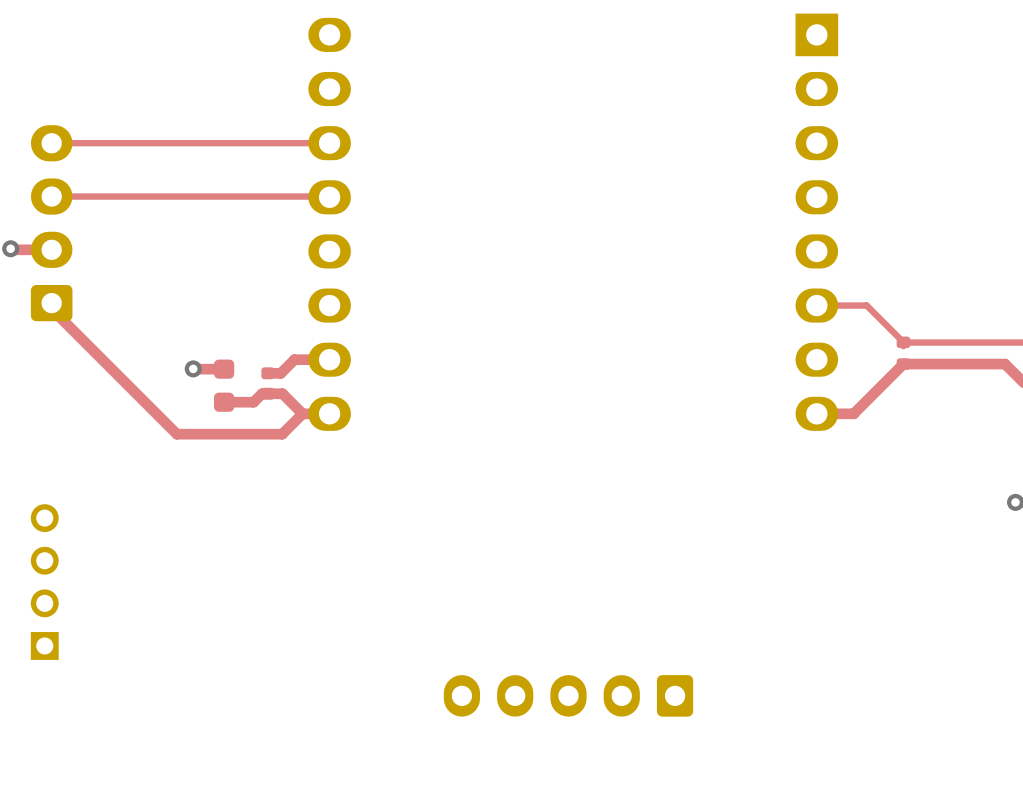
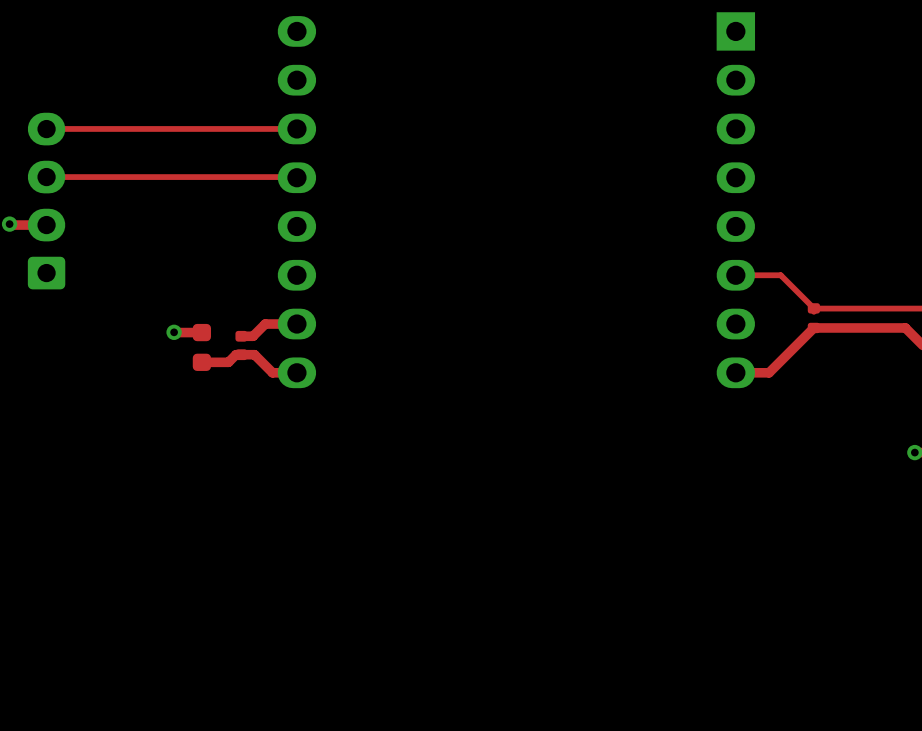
top track: (51, 308) (176, 434) (282, 434) (302, 413) -> none
part: (44, 582) -> none
part: (568, 695) -> none

